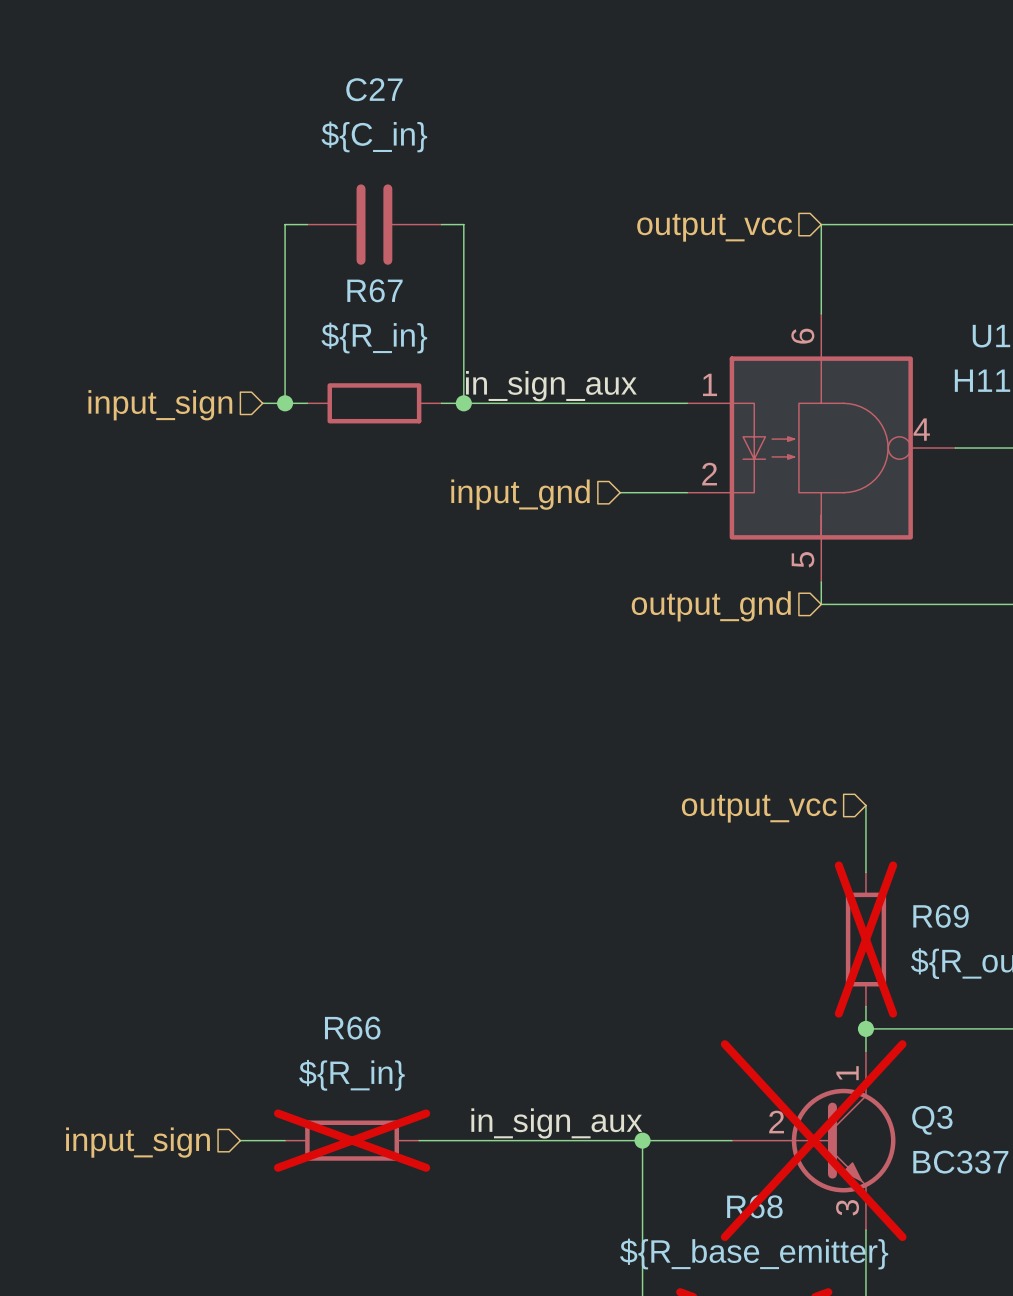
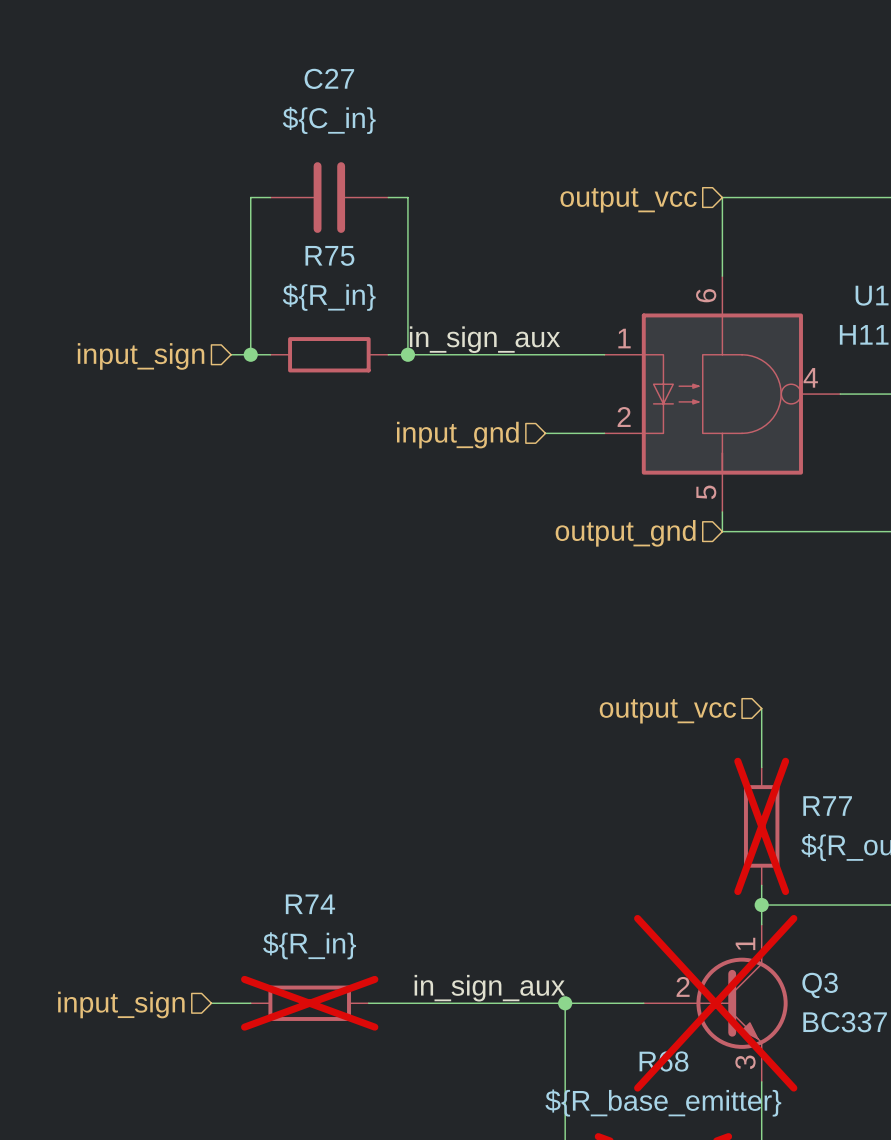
R67 name: R67 (374, 290) -> R75 (329, 255)
R69 name: R69 (941, 916) -> R77 (827, 806)
R66 name: R66 (352, 1028) -> R74 (310, 904)

